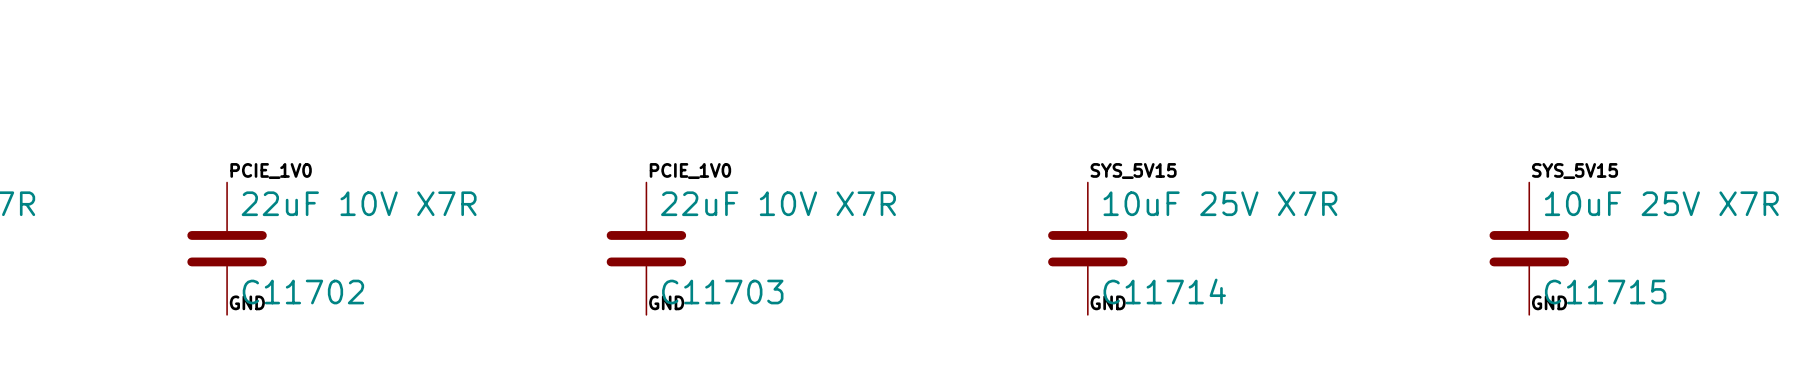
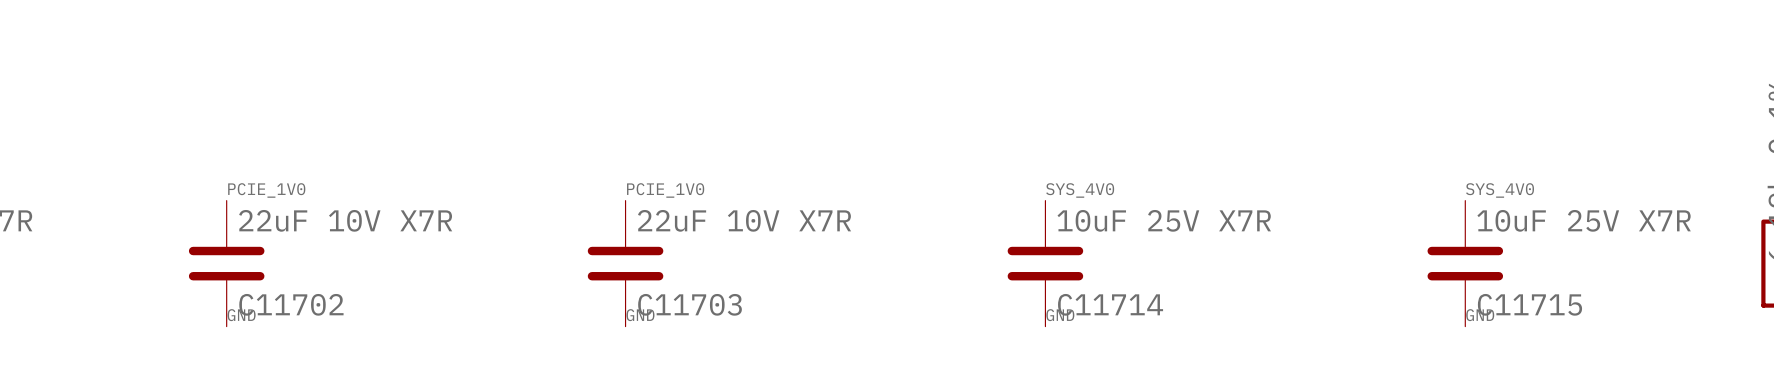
label: SYS_5V15 (1133, 171) -> SYS_4V0 (1080, 190)
label: SYS_5V15 (1575, 171) -> SYS_4V0 (1500, 190)

